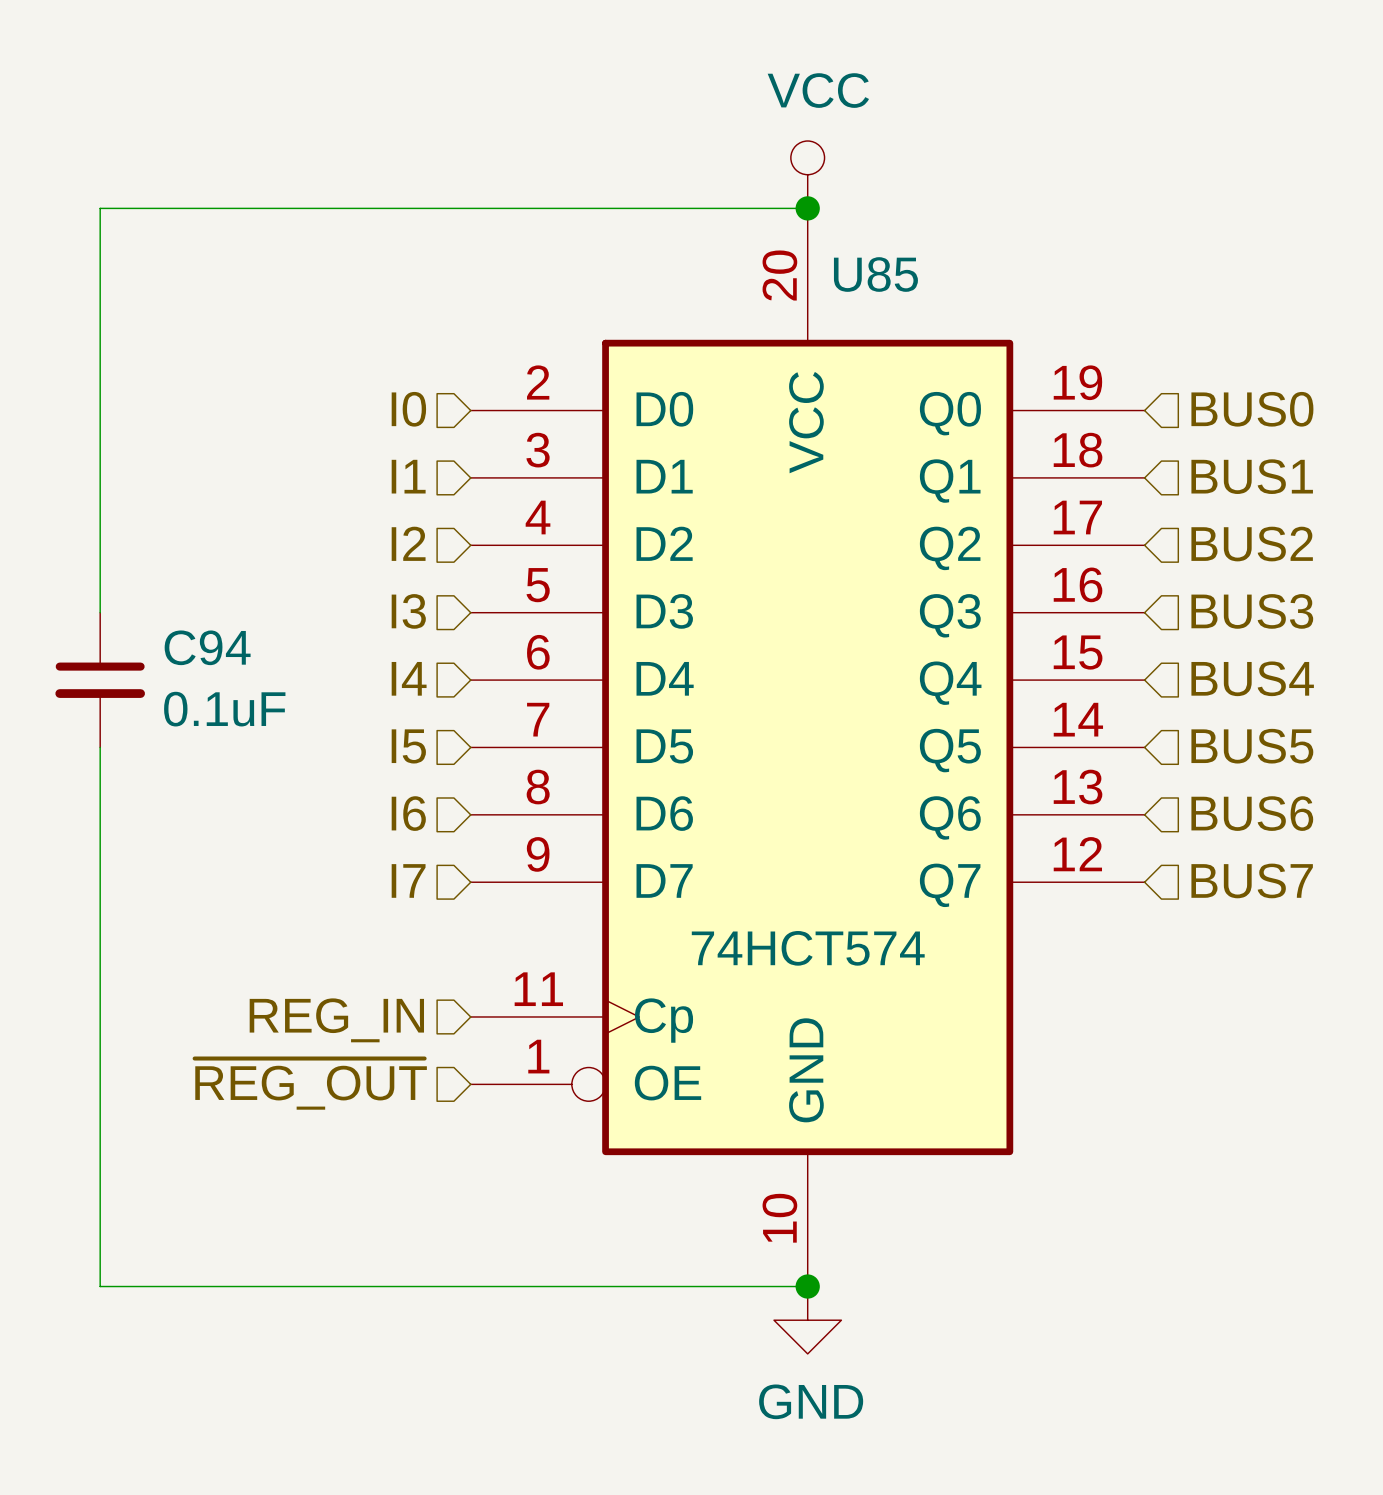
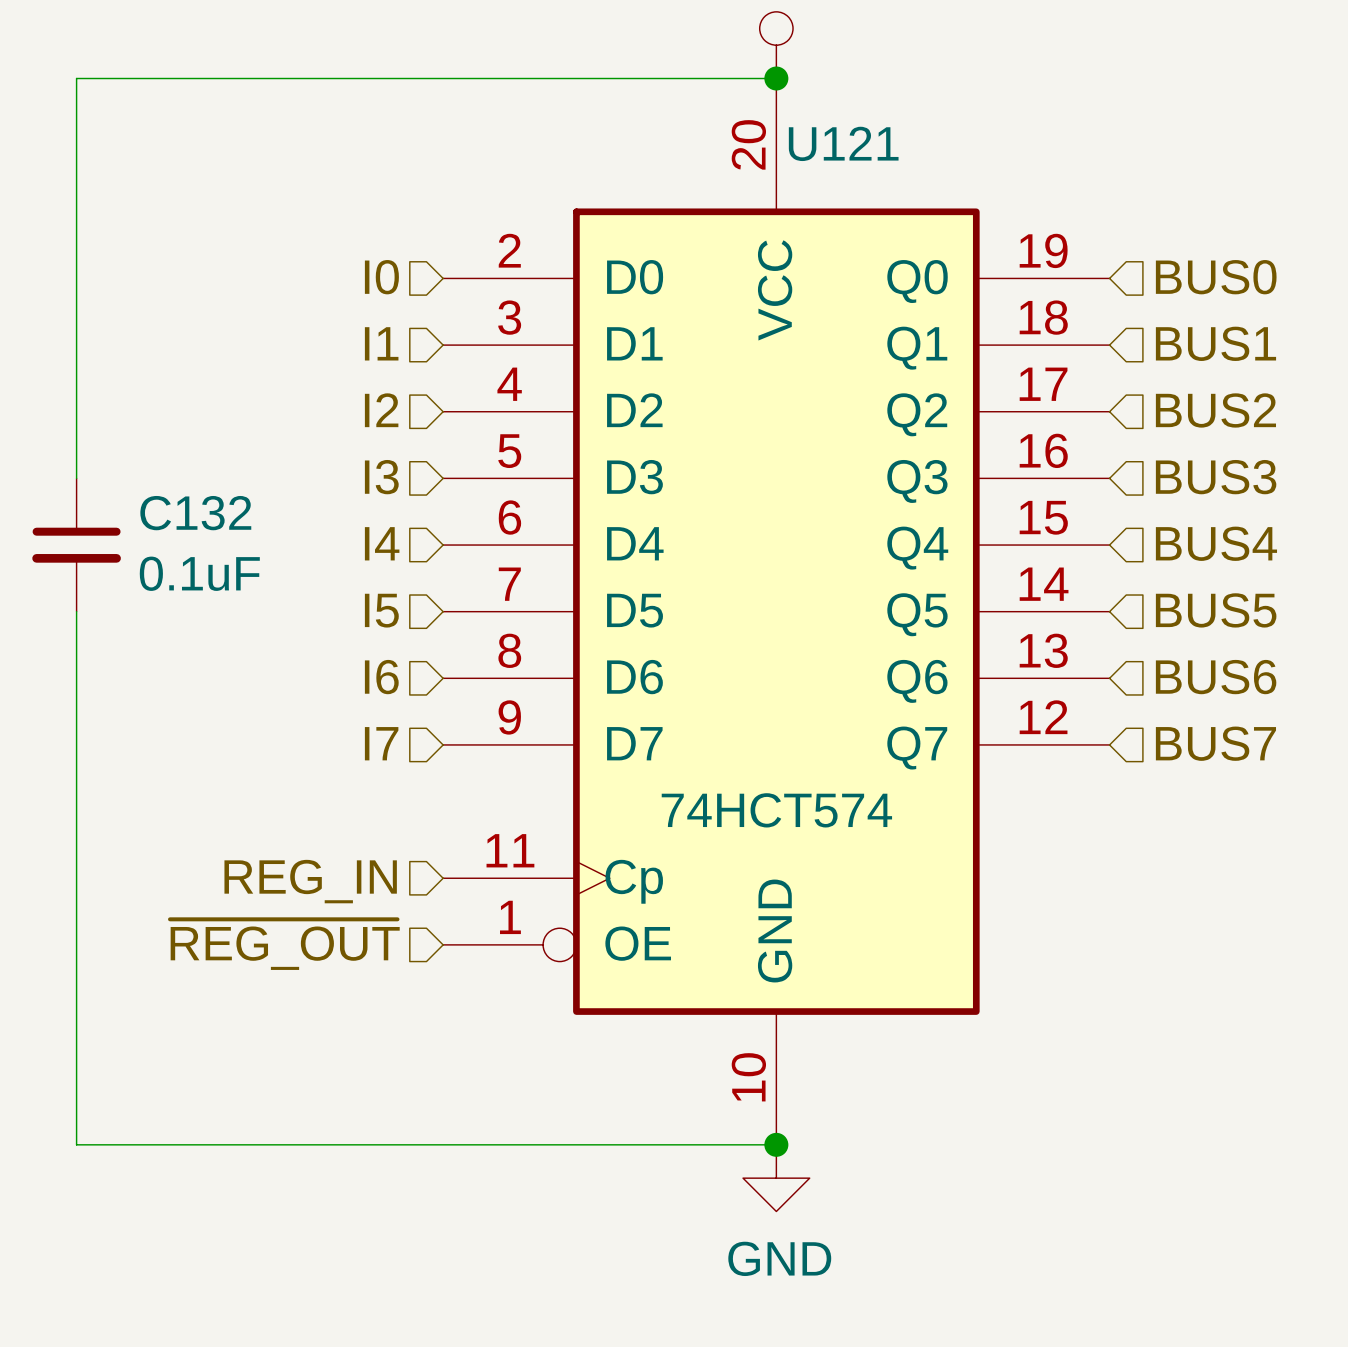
U85 name: U85 (875, 274) -> U121 (843, 143)
C94 name: C94 (207, 647) -> C132 (195, 513)

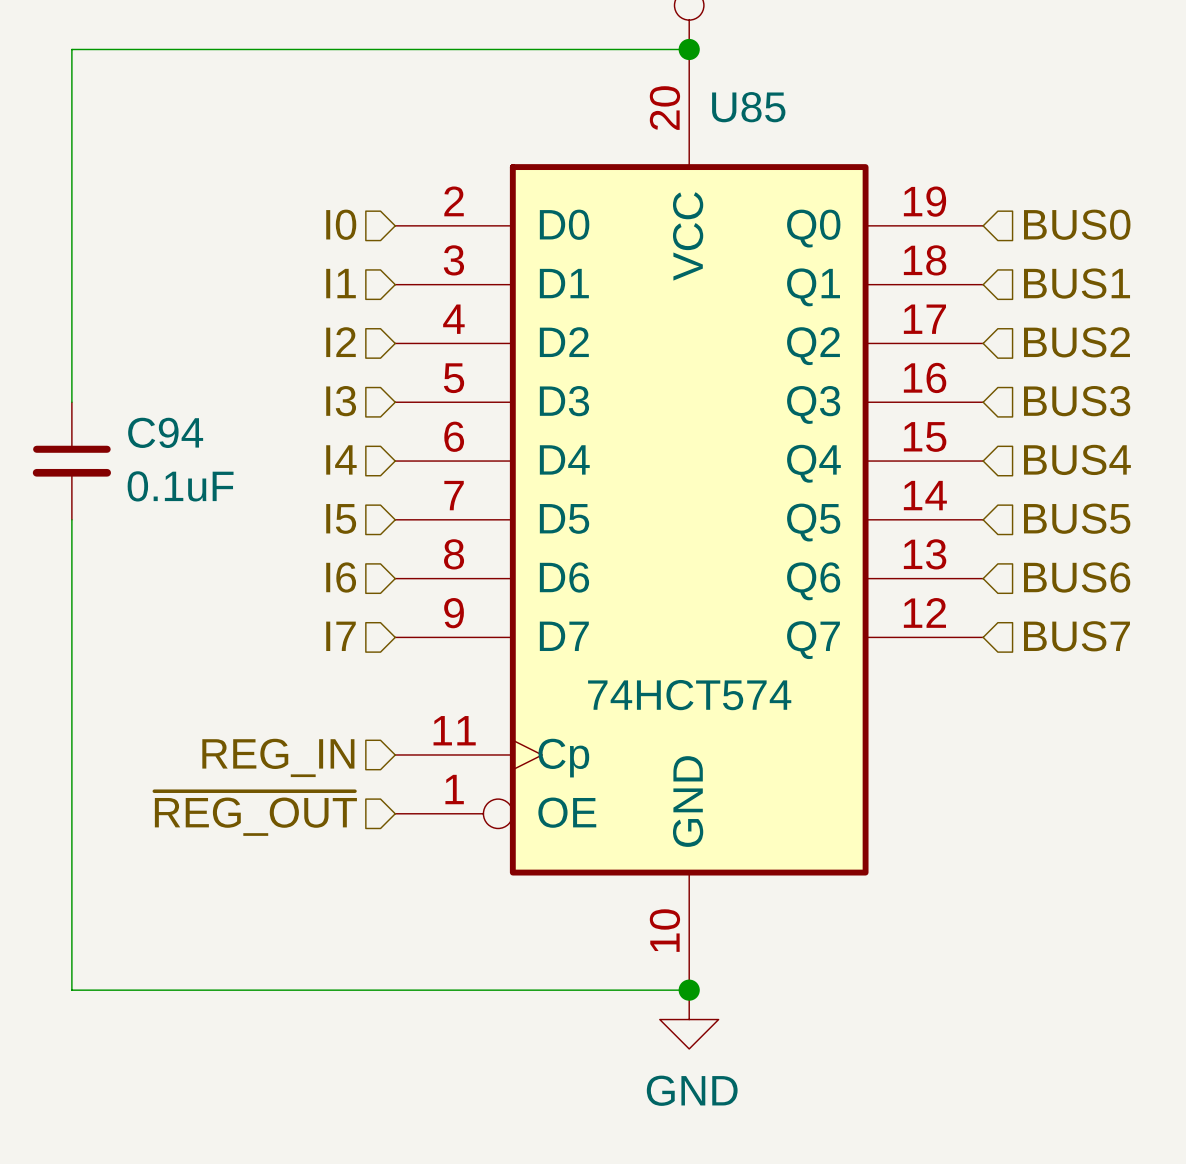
U121 name: U121 (843, 143) -> U85 (748, 107)
C132 name: C132 (195, 513) -> C94 (165, 432)

